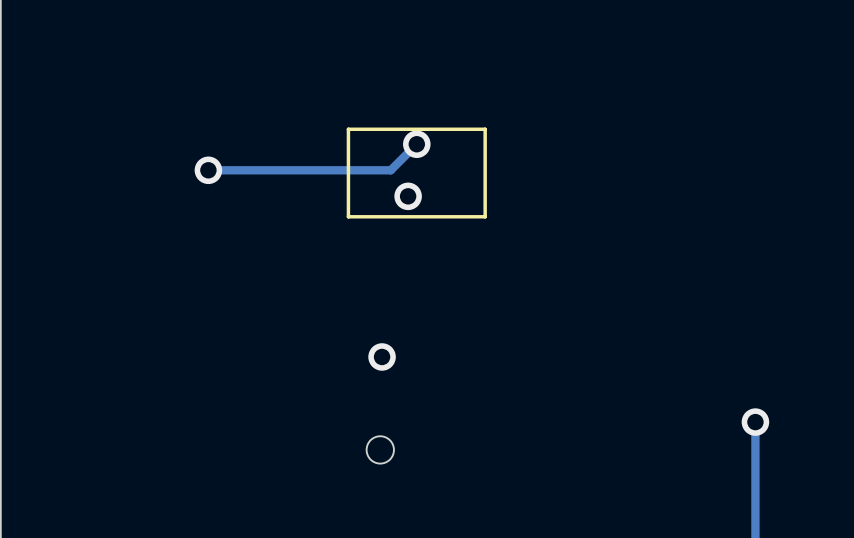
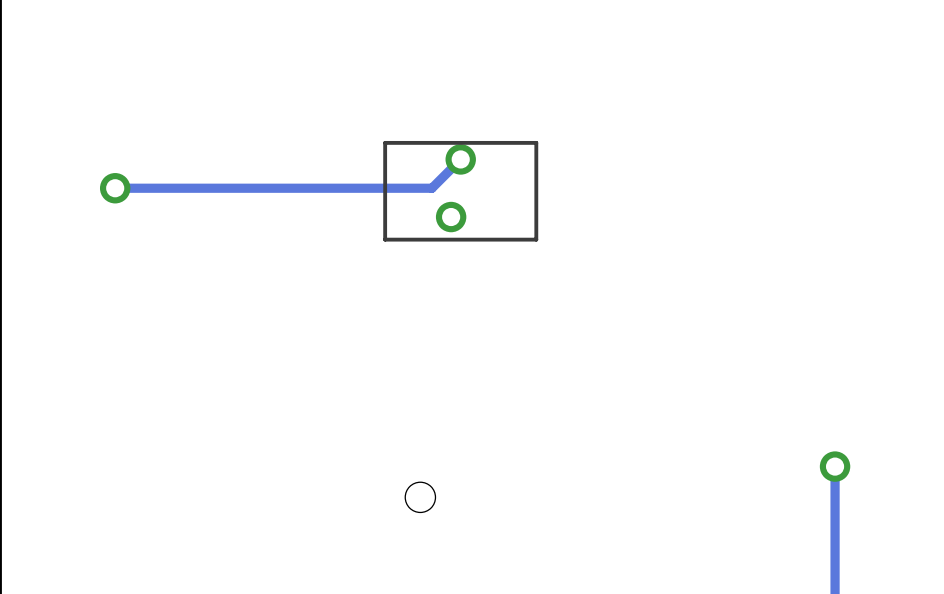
track: none -> (230, 188) (115, 188)
via position: (208, 170) -> (115, 188)
via: (382, 356) -> none

